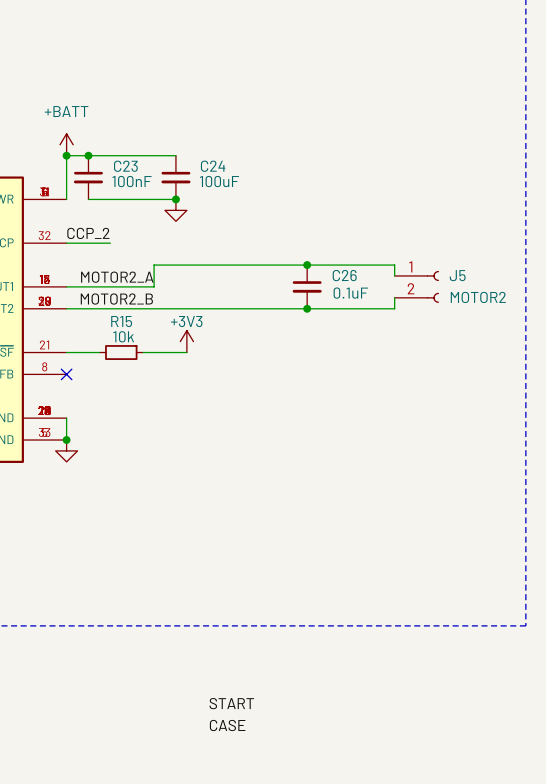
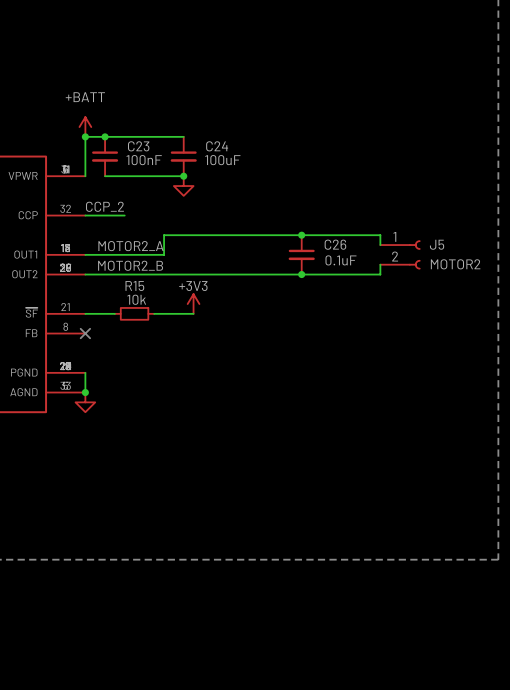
label: START (231, 703) -> none
label: CASE (227, 725) -> none

